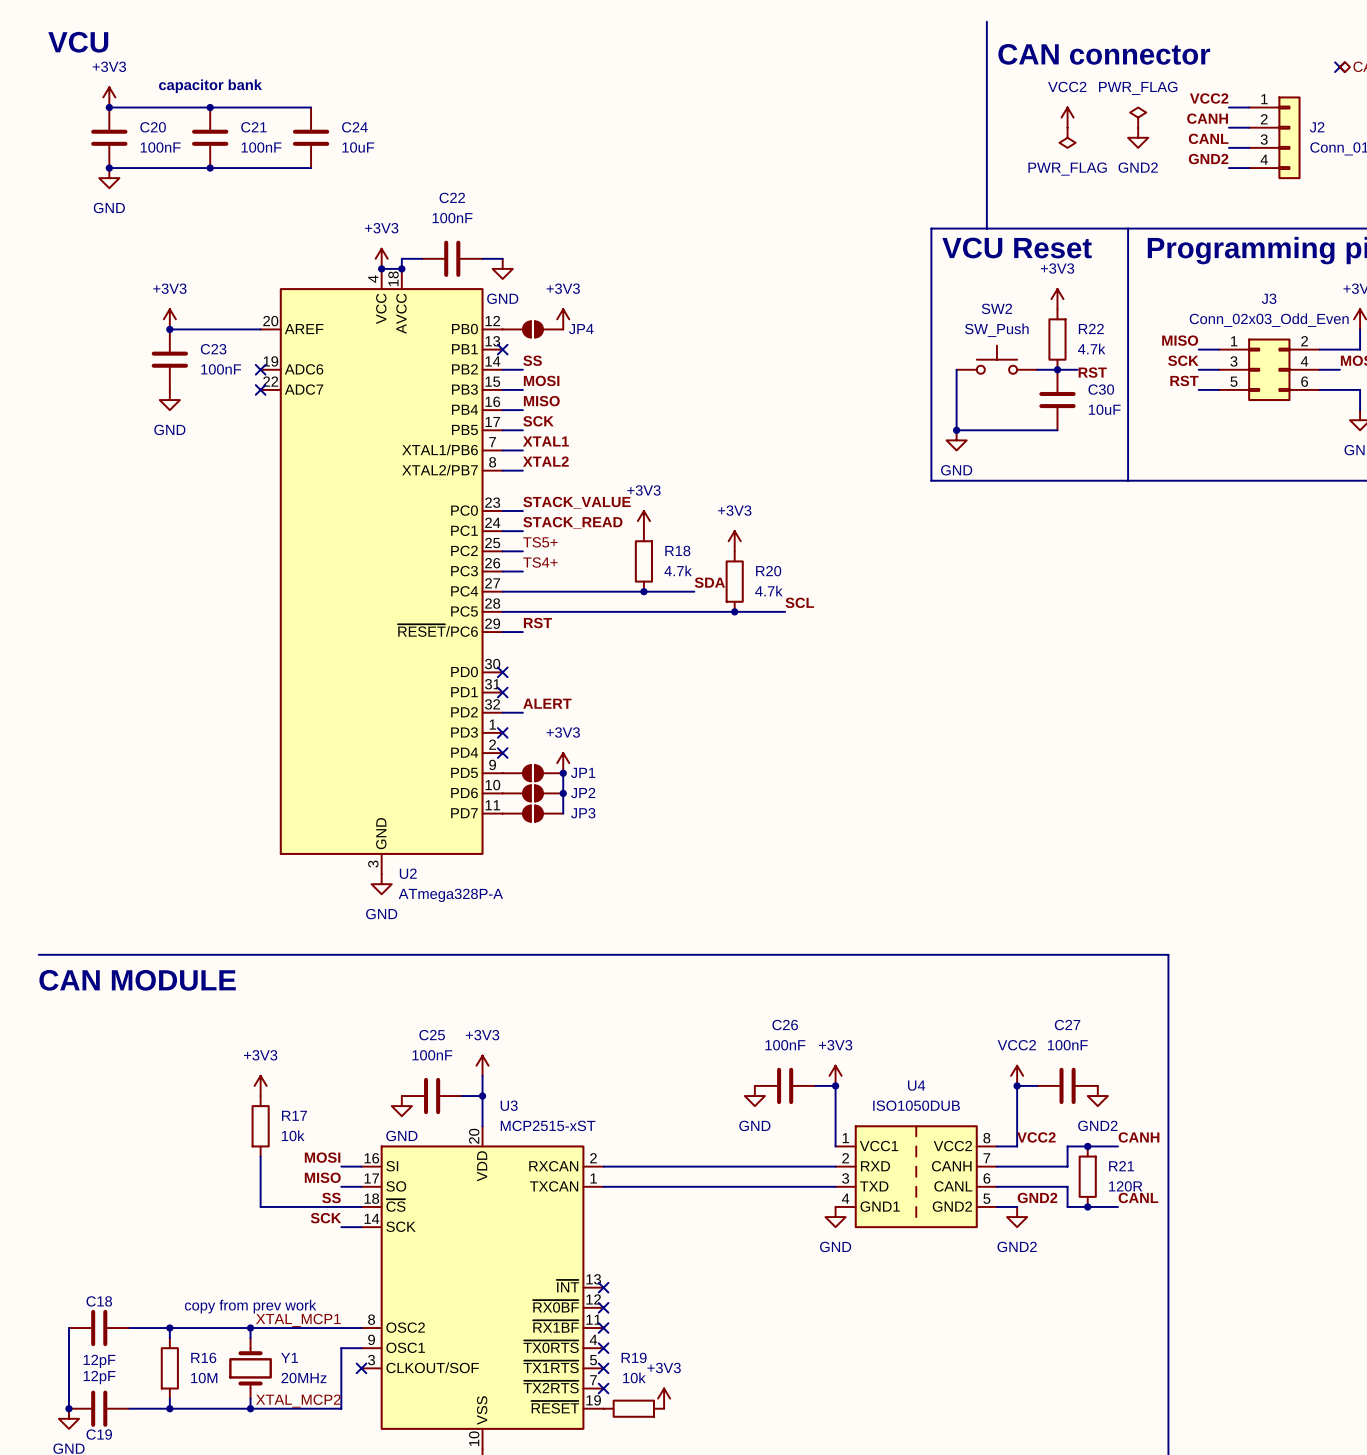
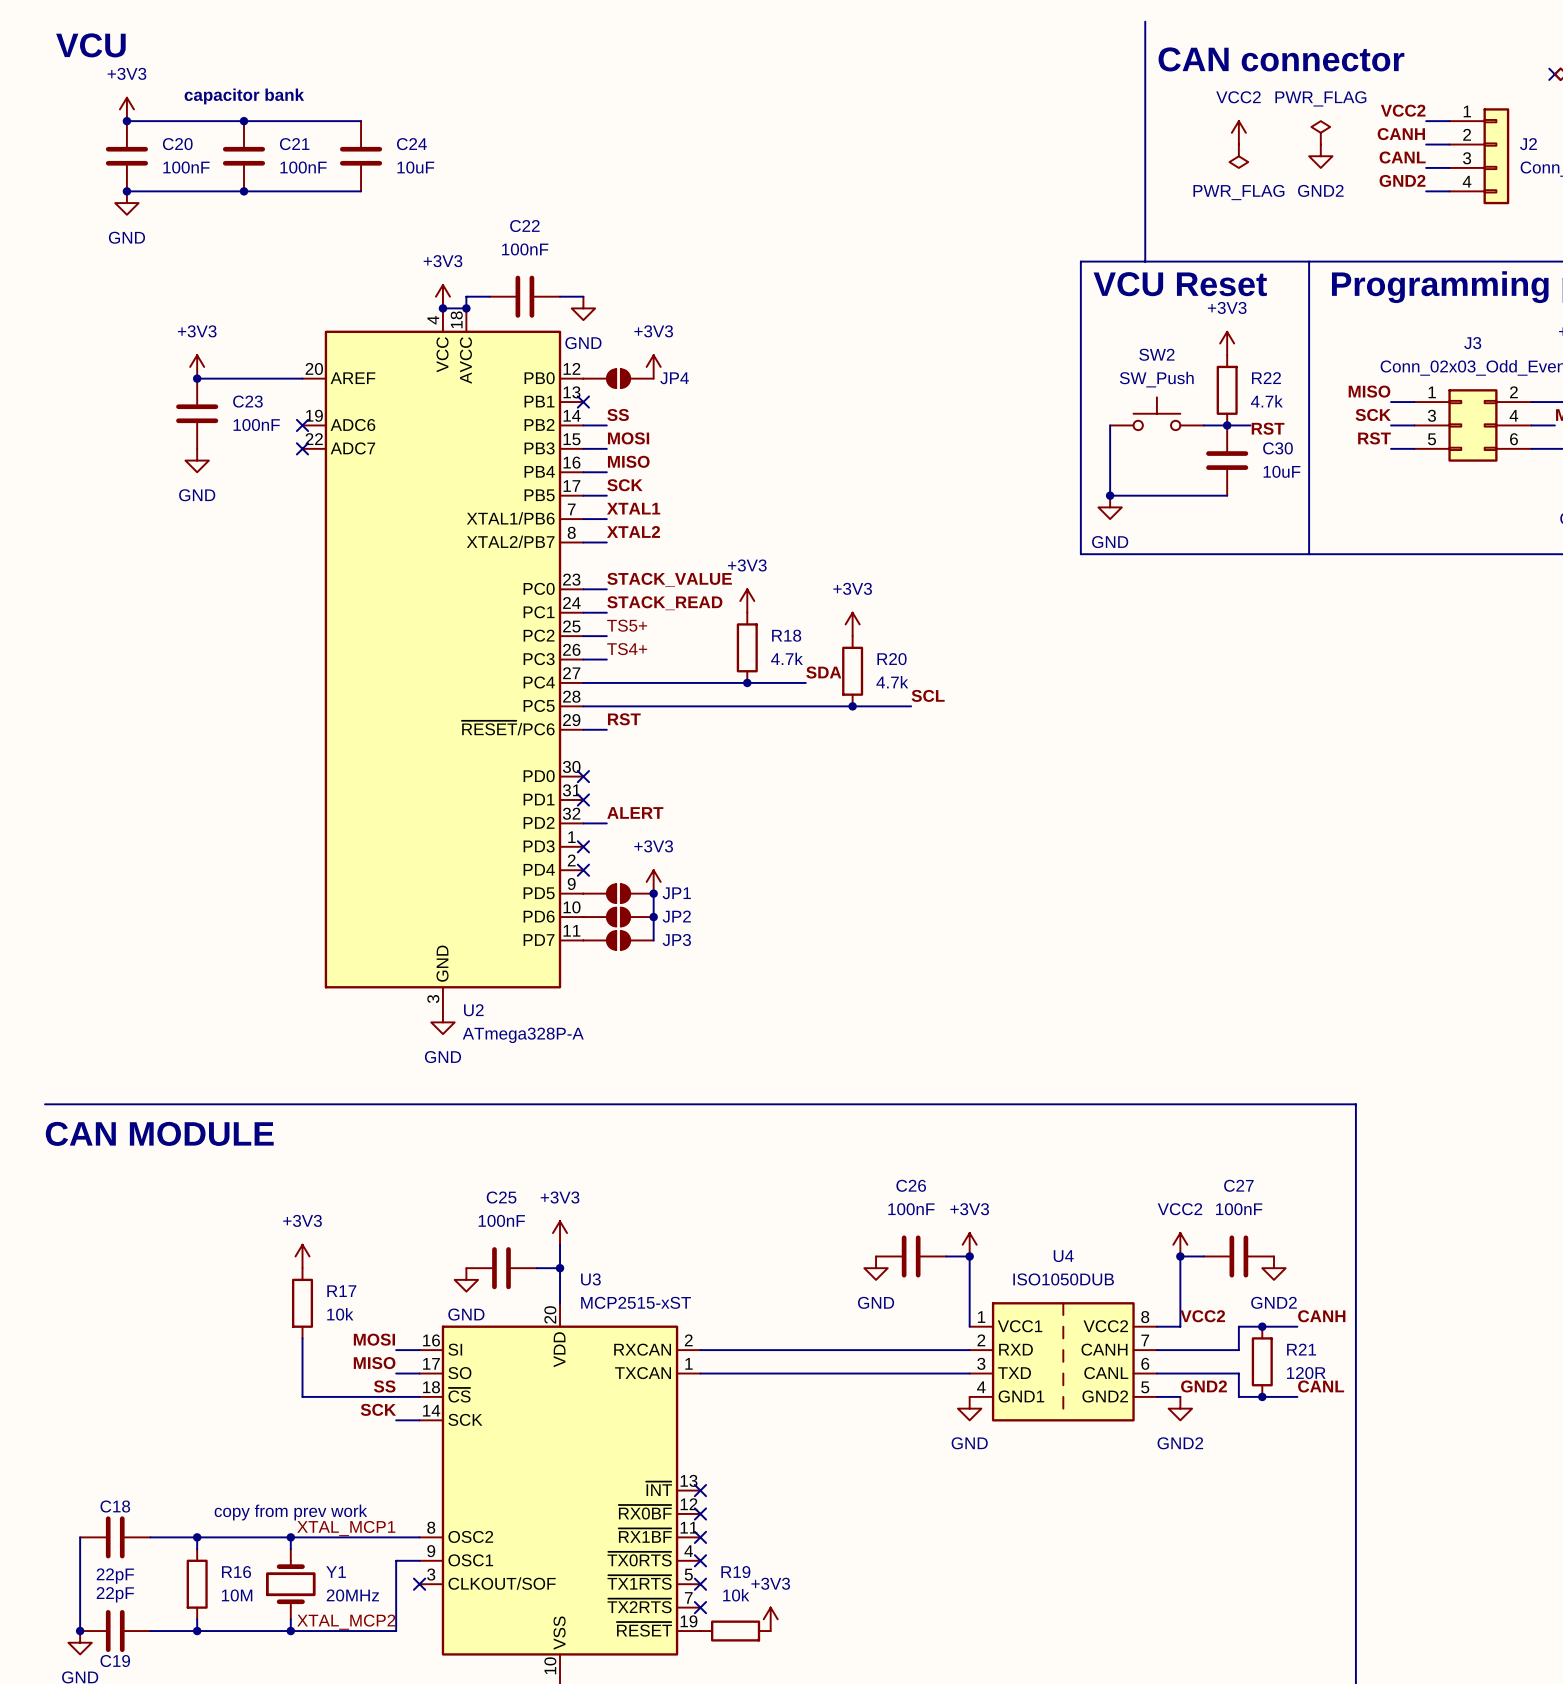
C18 value: 12pF (99, 1361) -> 22pF (115, 1576)
C19 value: 12pF (99, 1377) -> 22pF (115, 1594)

